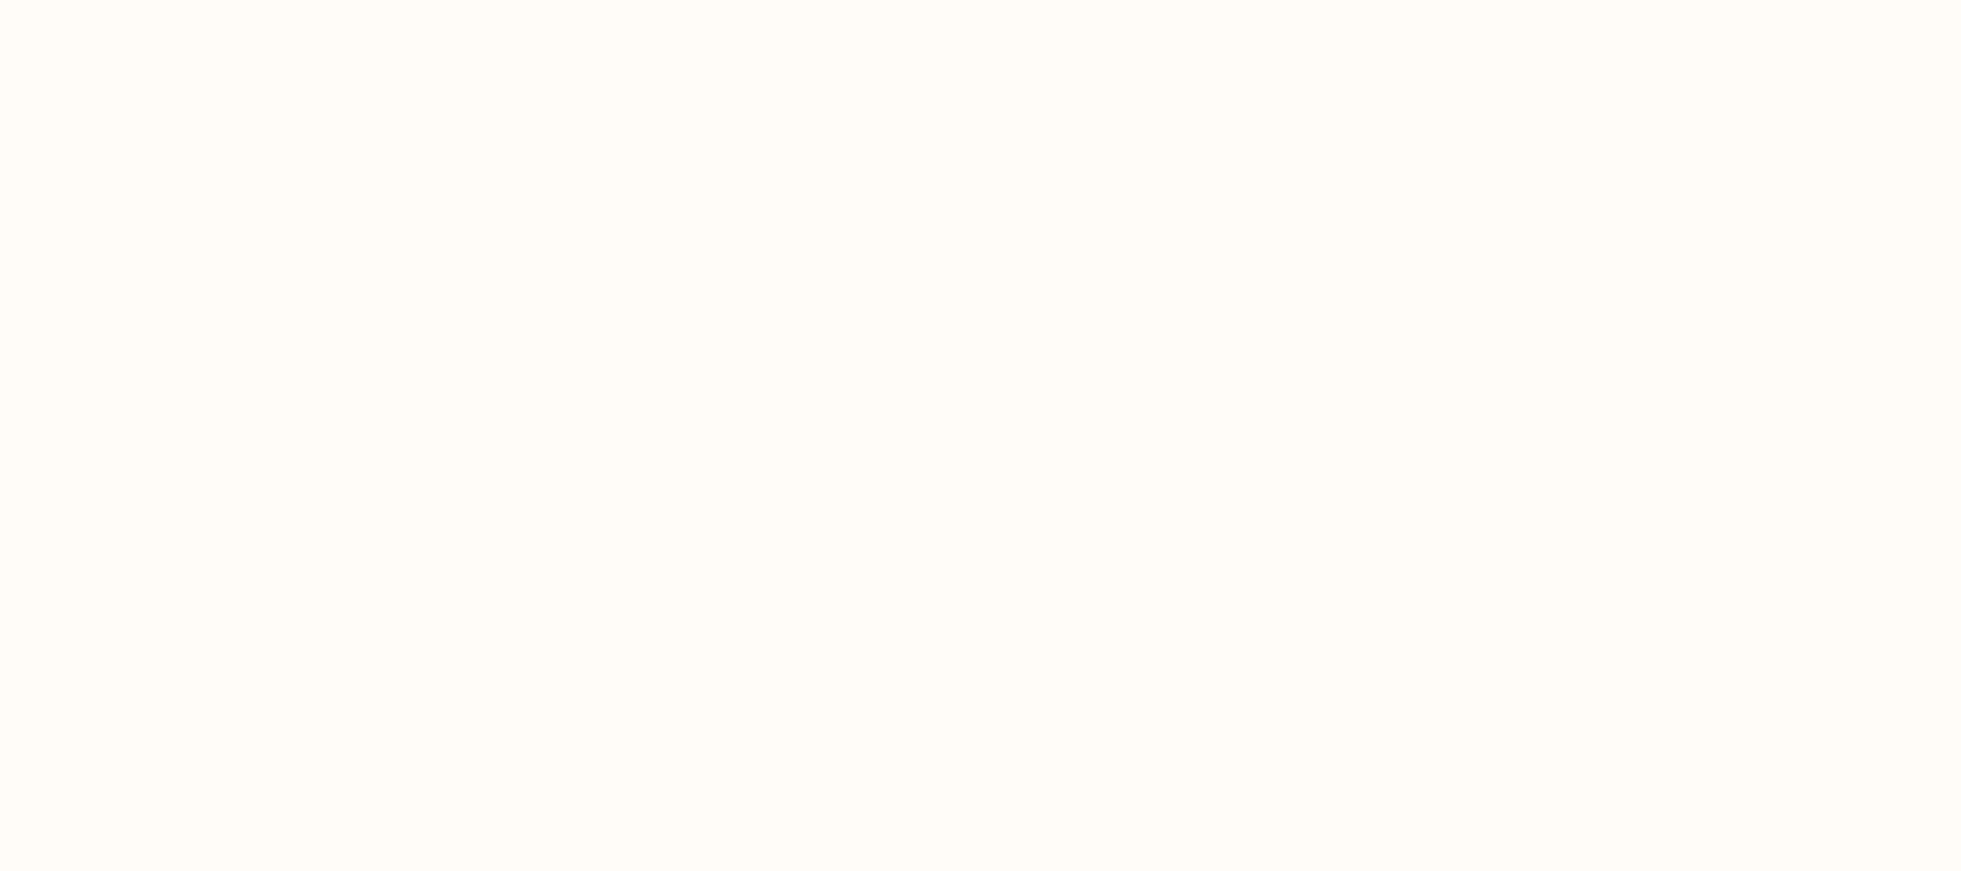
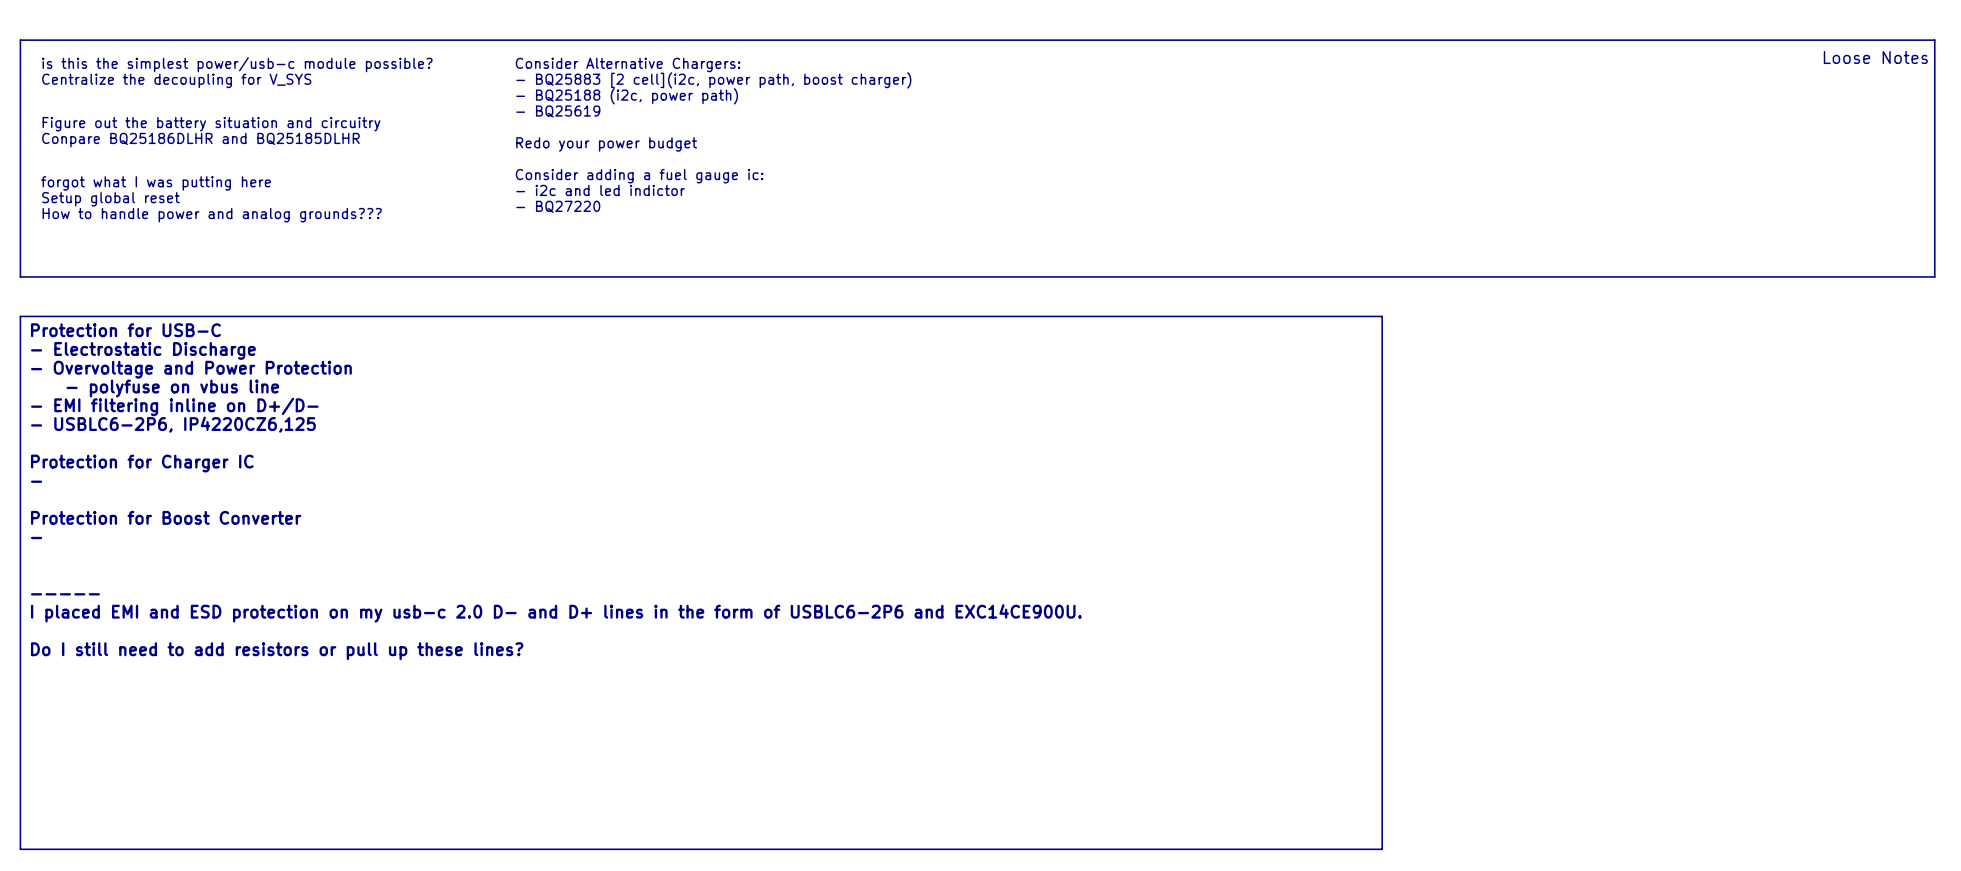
line: none -> (20, 40) (1934, 40) (1934, 276) (20, 276) (20, 40)
text: none -> Loose Notes (1875, 57)
text: none -> is this the simplest power/usb-c module possible? (237, 64)
text: none -> Consider Alternative Chargers: (628, 64)
text: none -> Centralize the decoupling for V_SYS (176, 80)
text: none -> - BQ25883 [2 cell](i2c, power path, boost charger) (713, 80)
text: none -> - BQ25188 (i2c, power path) (627, 96)
text: none -> - BQ25619 (558, 111)
text: none -> Figure out the battery situation and circuitry (211, 124)
text: none -> Conpare BQ25186DLHR and BQ25185DLHR (200, 140)
text: none -> Redo your power budget (606, 144)
text: none -> Consider adding a fuel gauge ic: (639, 176)
text: none -> forgot what I was putting here (156, 183)
text: none -> - i2c and led indictor (600, 190)
text: none -> Setup global reset (110, 199)
text: none -> - BQ27220 (558, 206)
text: none -> How to handle power and analog grounds??? (212, 215)
line: none -> (20, 316) (1382, 316) (1382, 849) (20, 849) (20, 316)
text: none -> Protection for USB-C (125, 330)
text: none -> - Electrostatic Discharge (143, 350)
text: none -> - Overvoltage and Power Protection (191, 369)
text: none -> - polyfuse on vbus line (172, 388)
text: none -> - EMI filtering inline on D+/D- (174, 406)
text: none -> - USBLC6-2P6, IP4220CZ6,125 (173, 424)
text: none -> Protection for Charger IC (142, 463)
text: none -> - (36, 481)
text: none -> Protection for Boost Converter (166, 517)
text: none -> - (36, 538)
text: none -> ----- (65, 594)
text: none -> I placed EMI and ESD protection on my usb-c 2.0 D- and D+ lines in the form of USBLC6-2P6 and EXC14CE900U. (556, 613)
text: none -> Do I still need to add resistors or pull up these lines? (277, 651)

